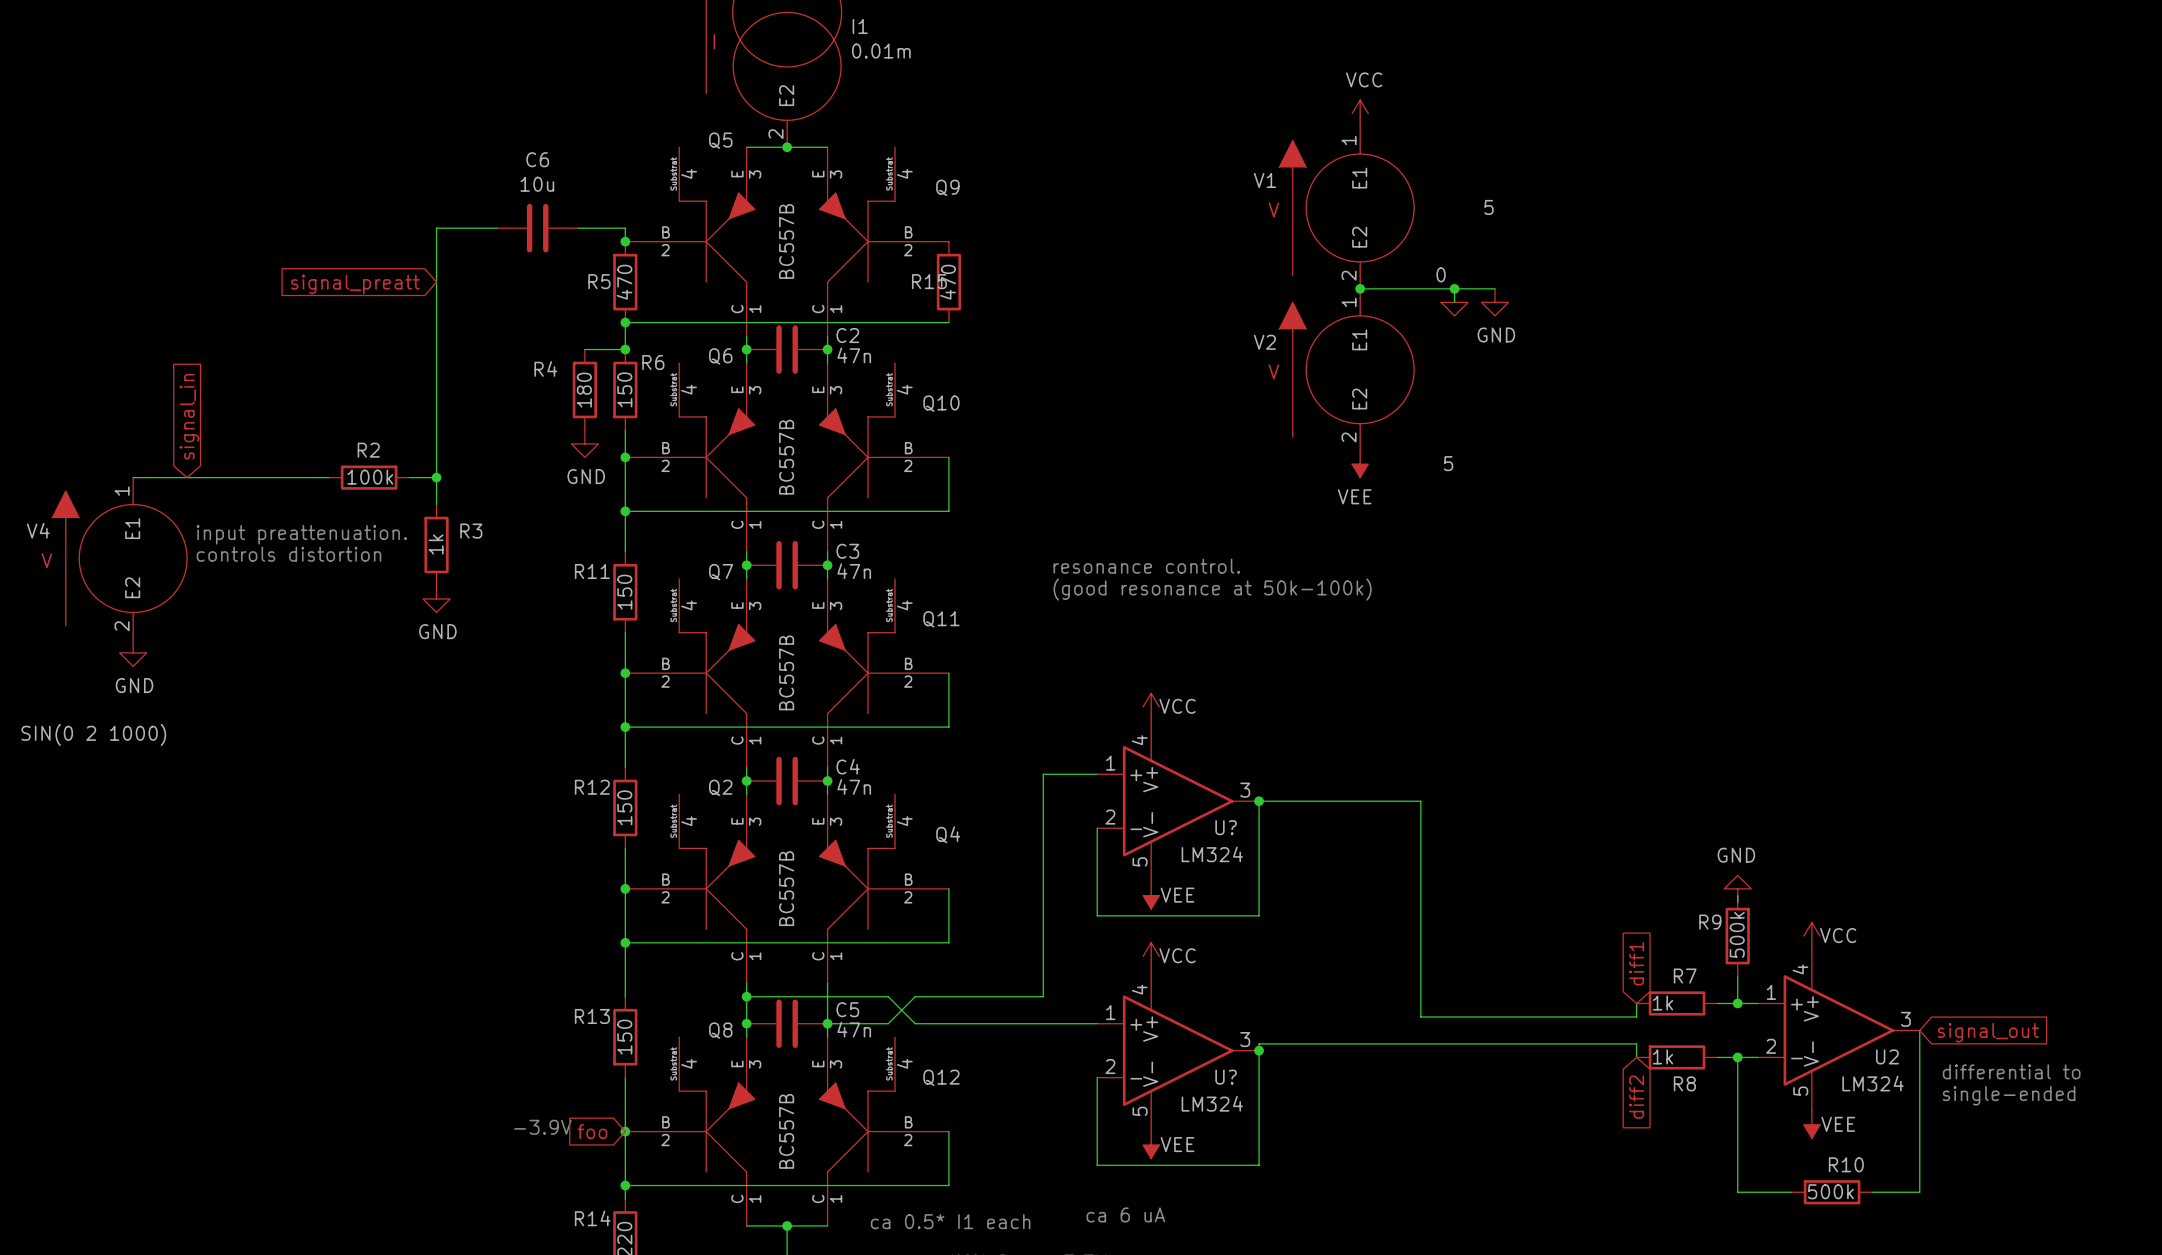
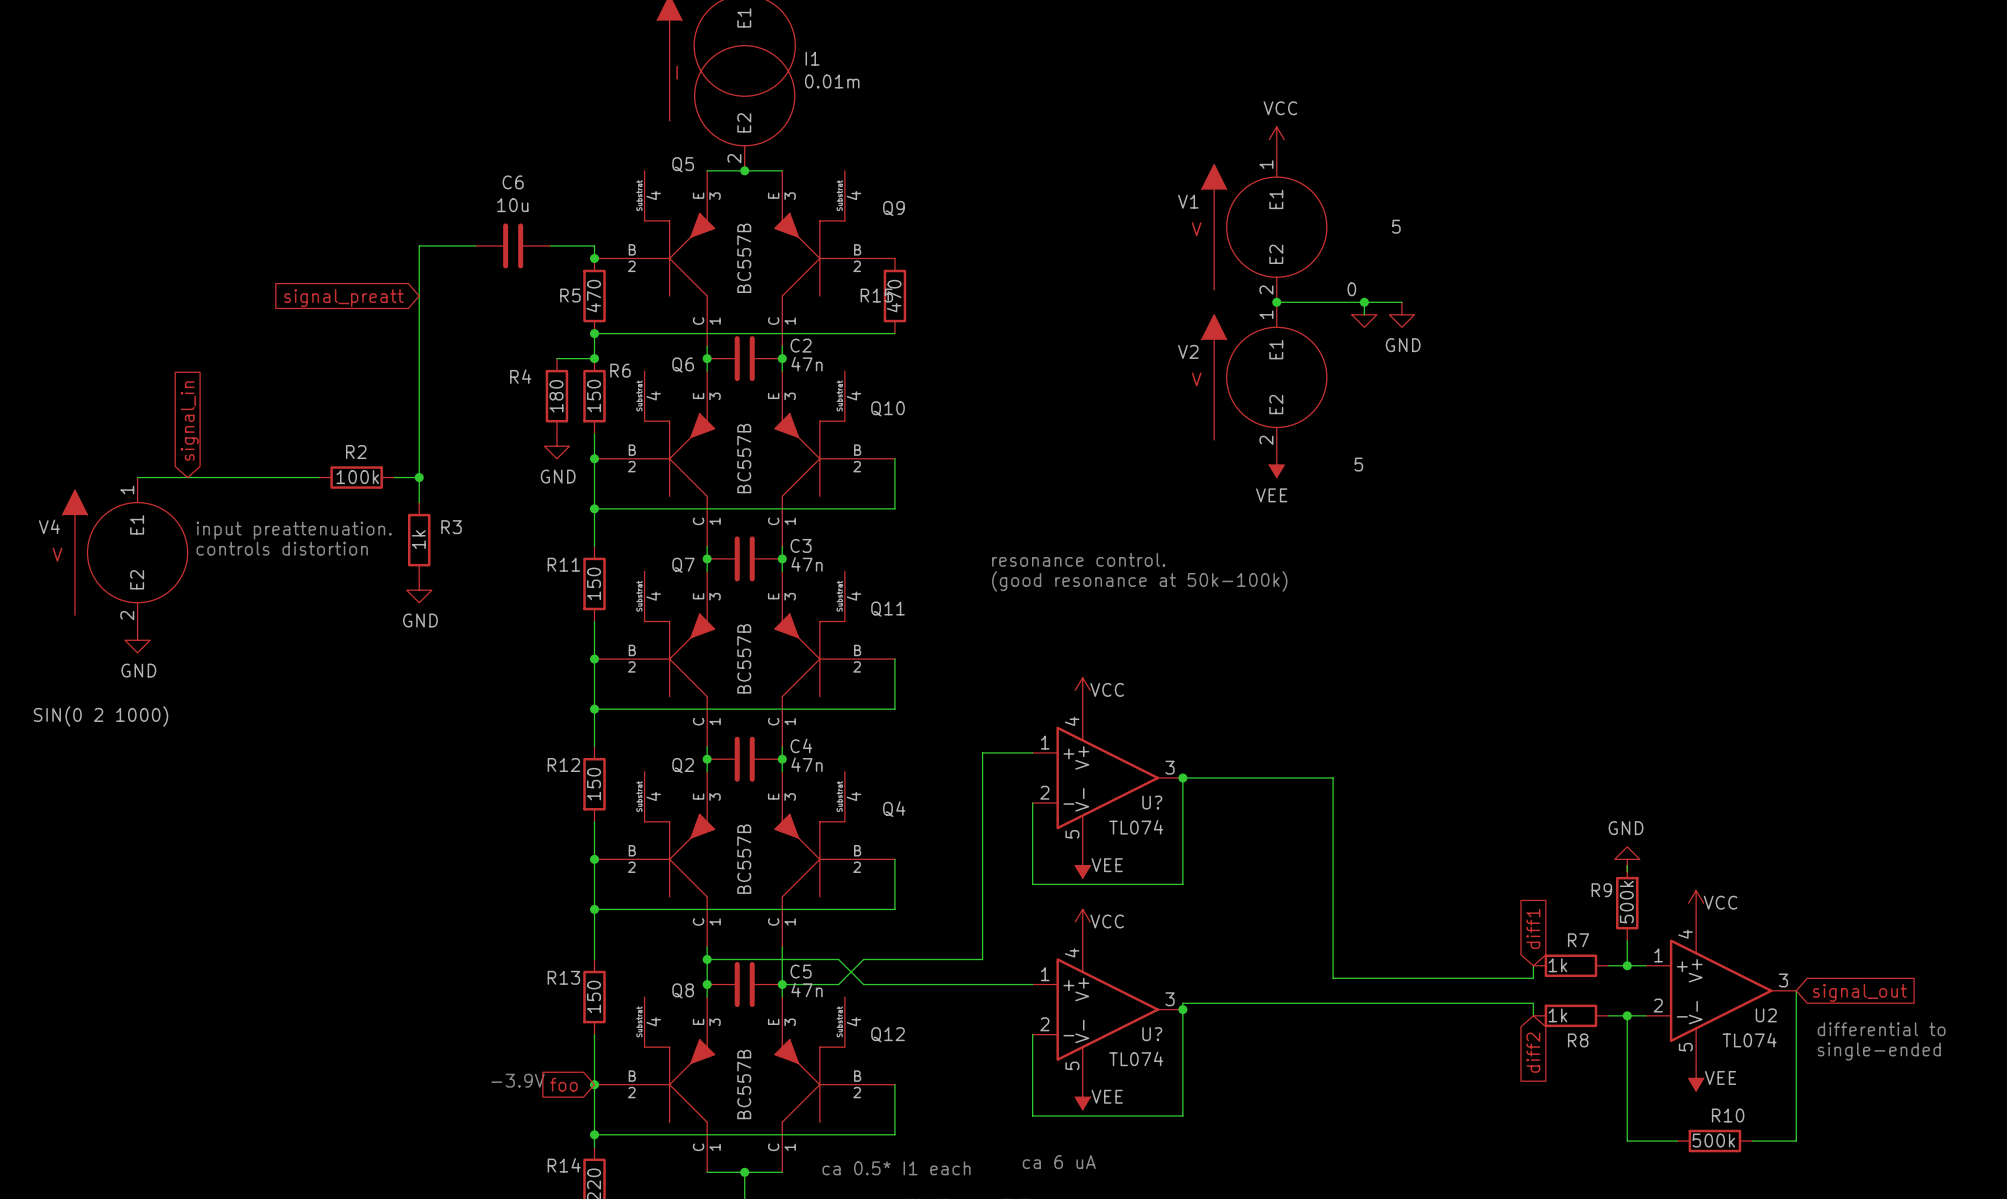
U? value: LM324 (1212, 854) -> TL074 (1136, 827)
U2 value: LM324 (1872, 1083) -> TL074 (1749, 1040)
U? value: LM324 (1212, 1103) -> TL074 (1136, 1058)

